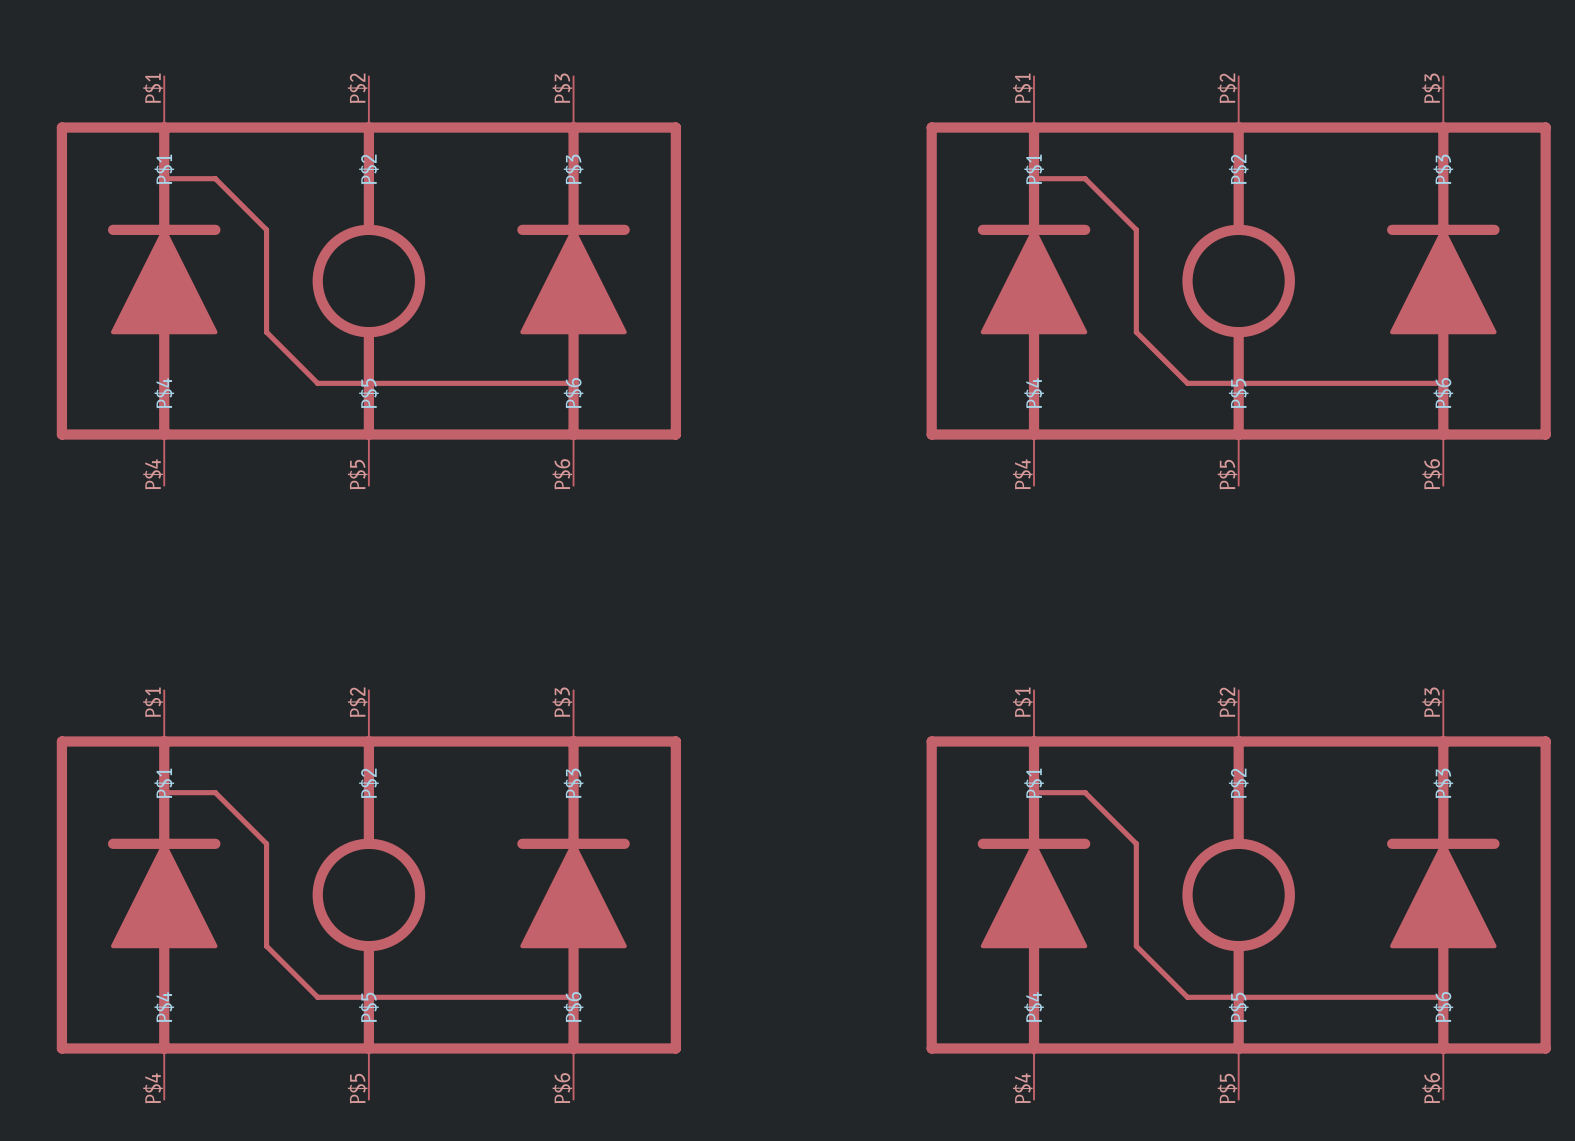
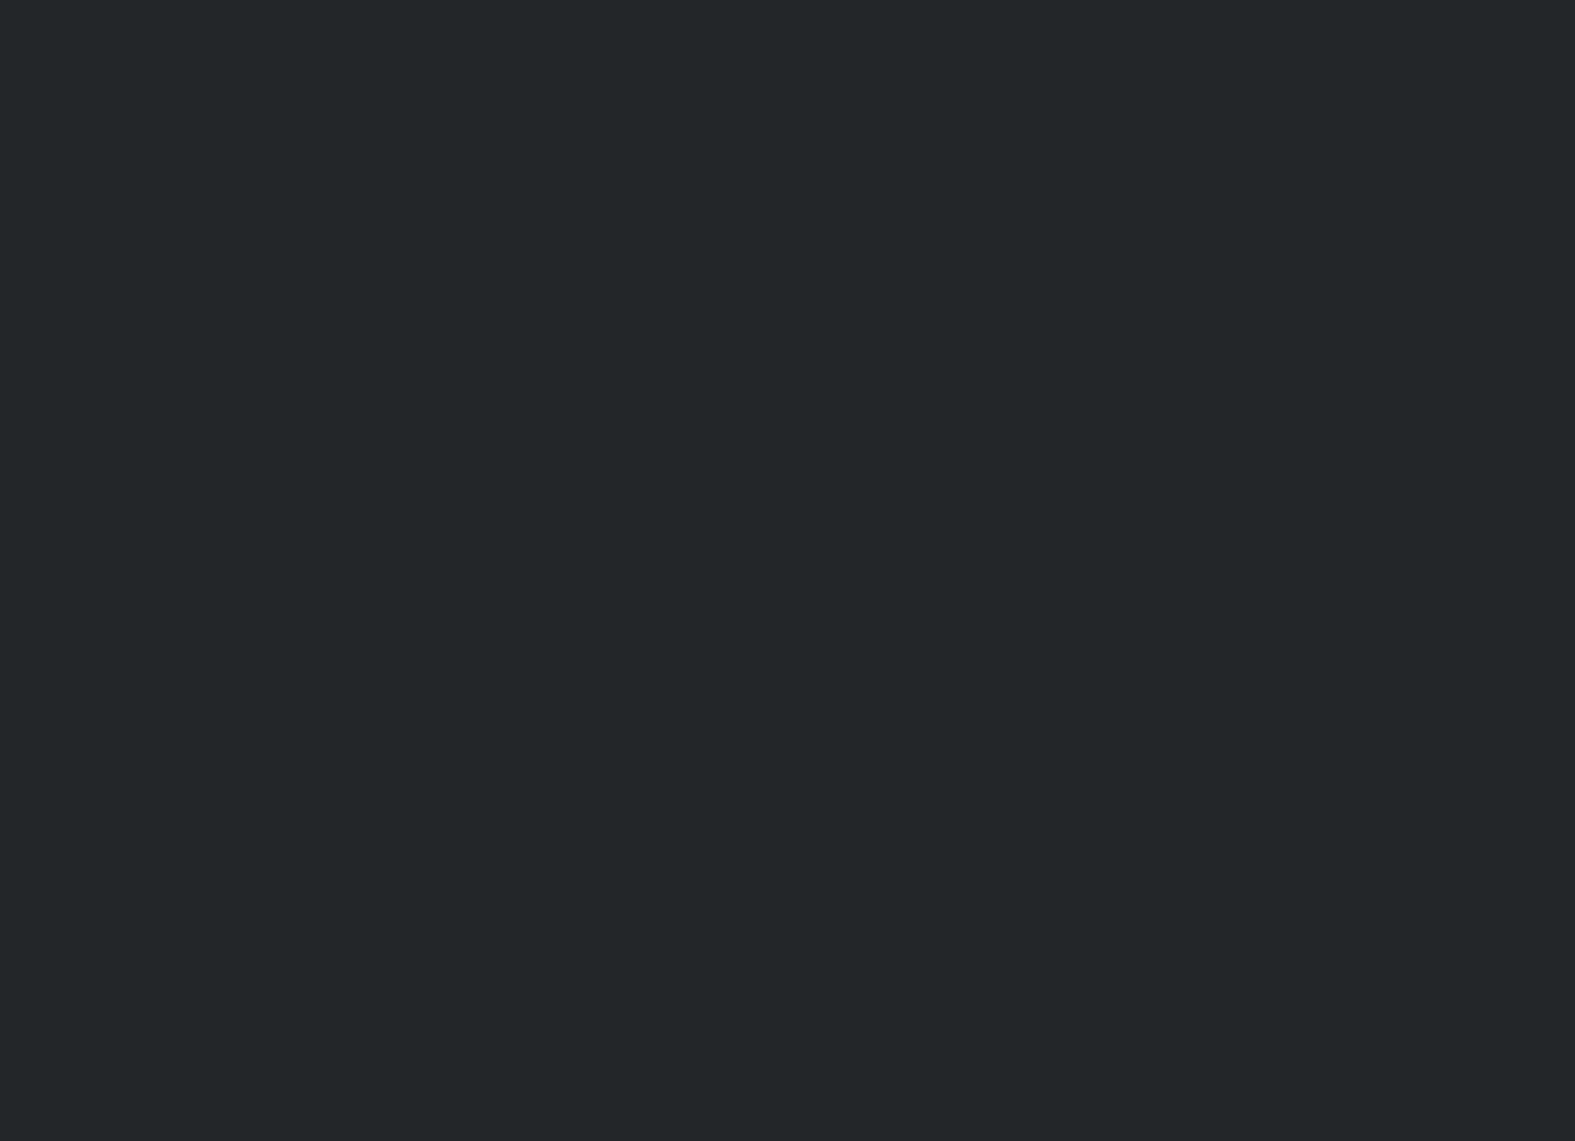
part: (368, 281) -> none
part: (1238, 281) -> none
part: (368, 894) -> none
part: (1238, 894) -> none

